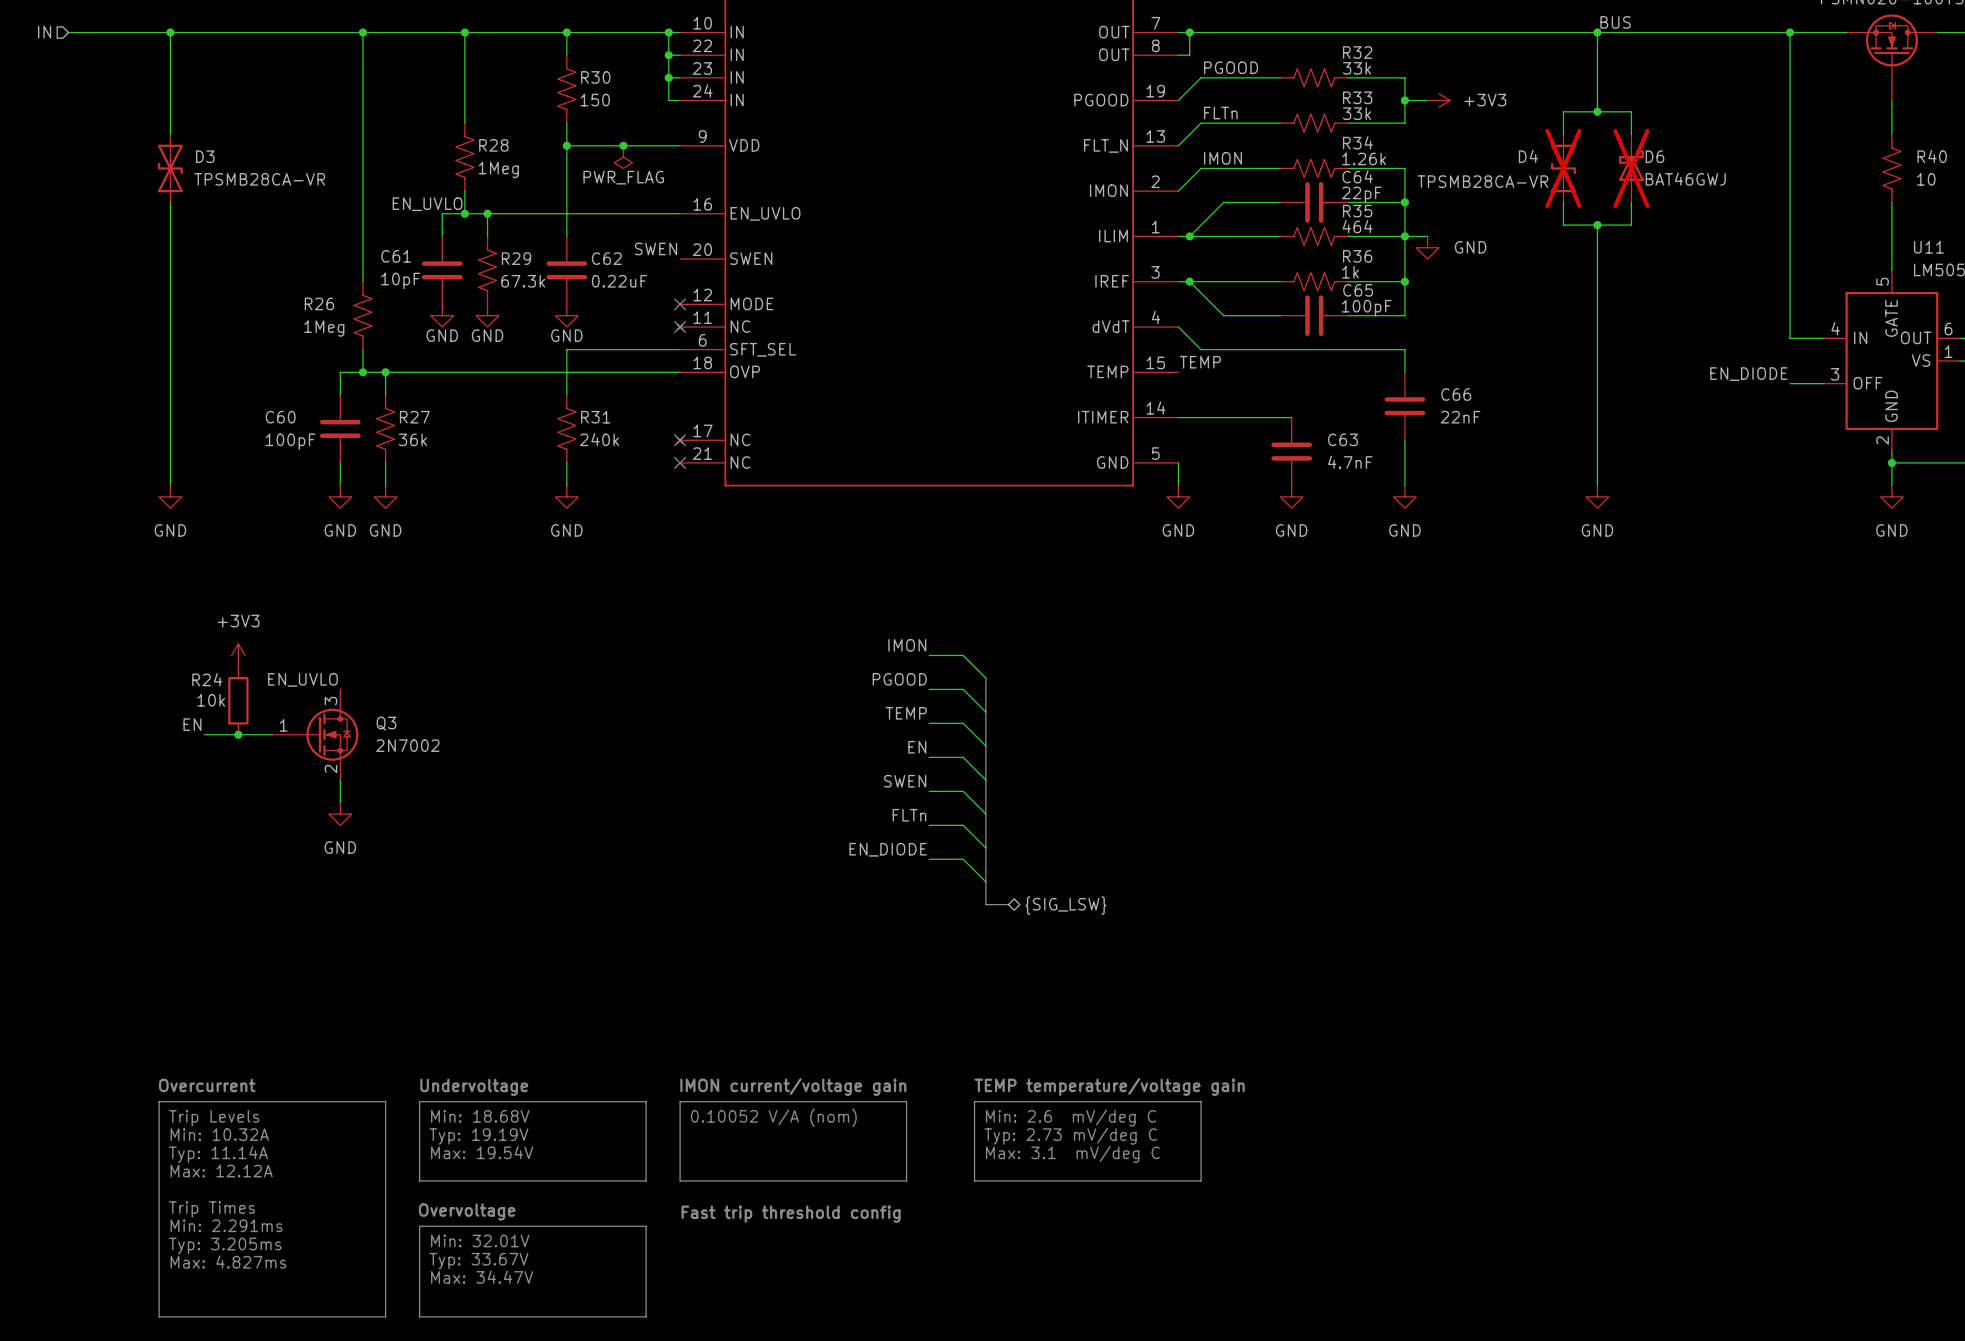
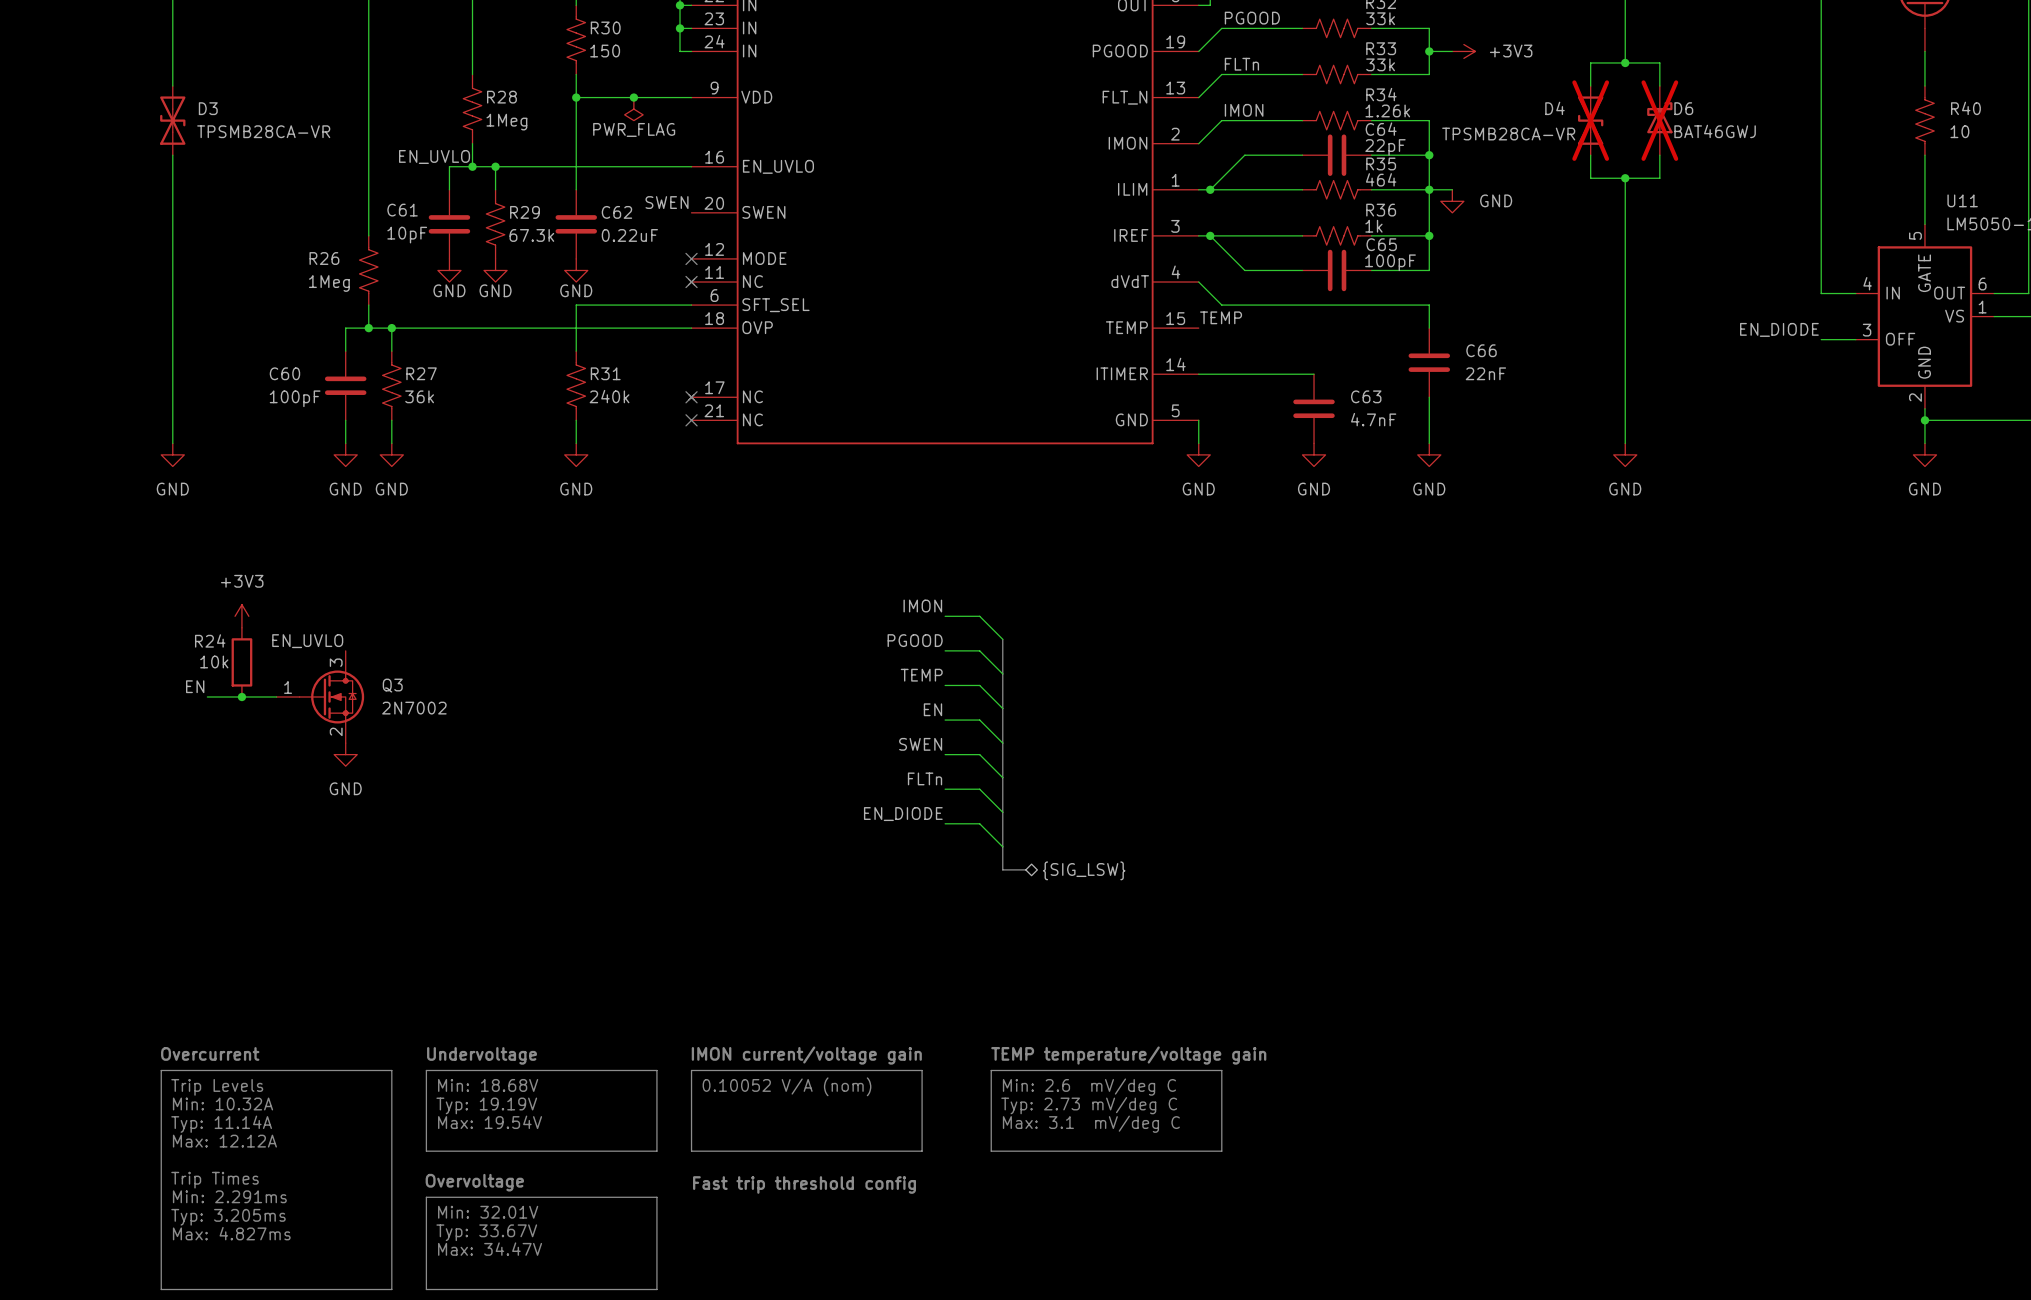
power symbol position: GND (340, 814) -> GND (345, 754)

